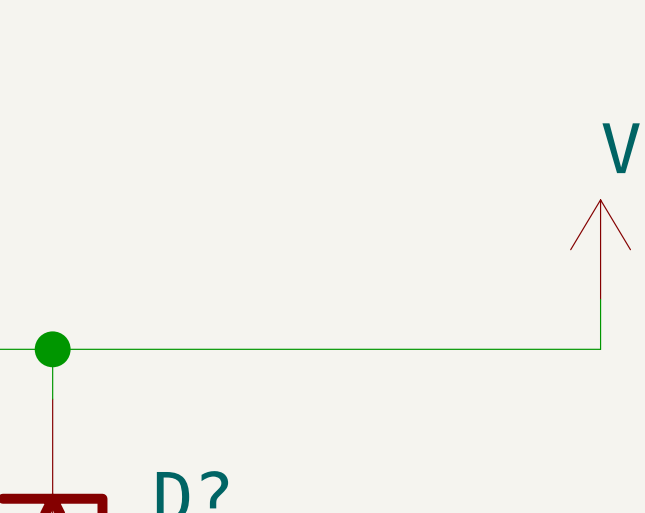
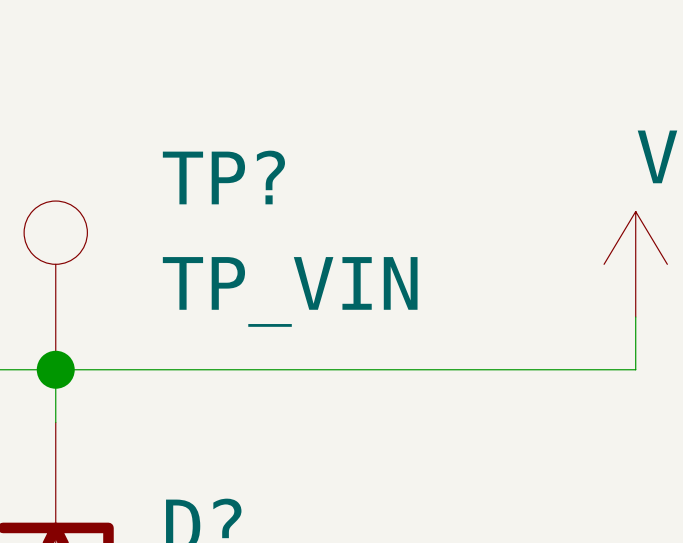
TP?: none -> TP_VIN (55, 285)

